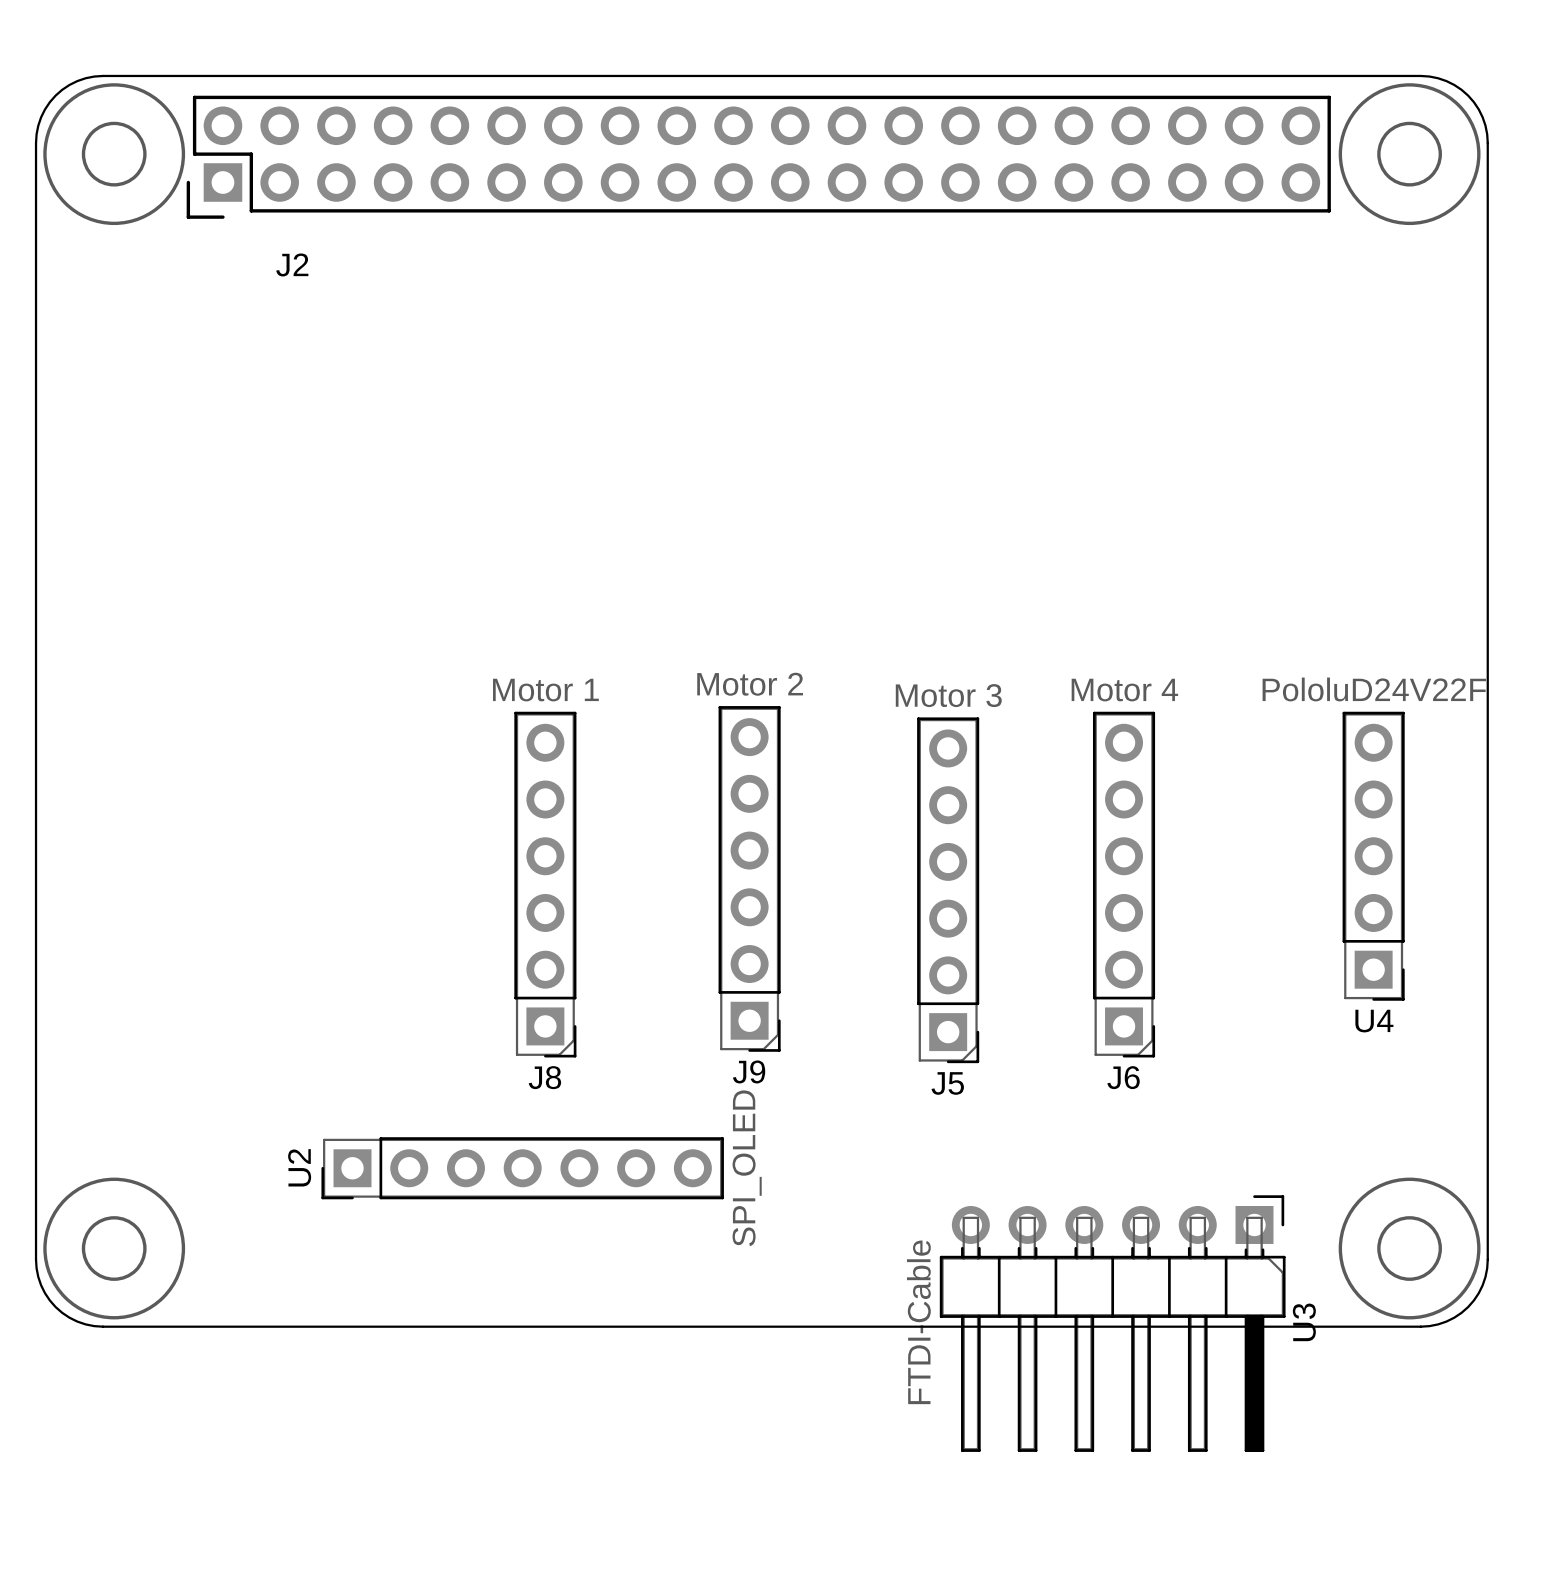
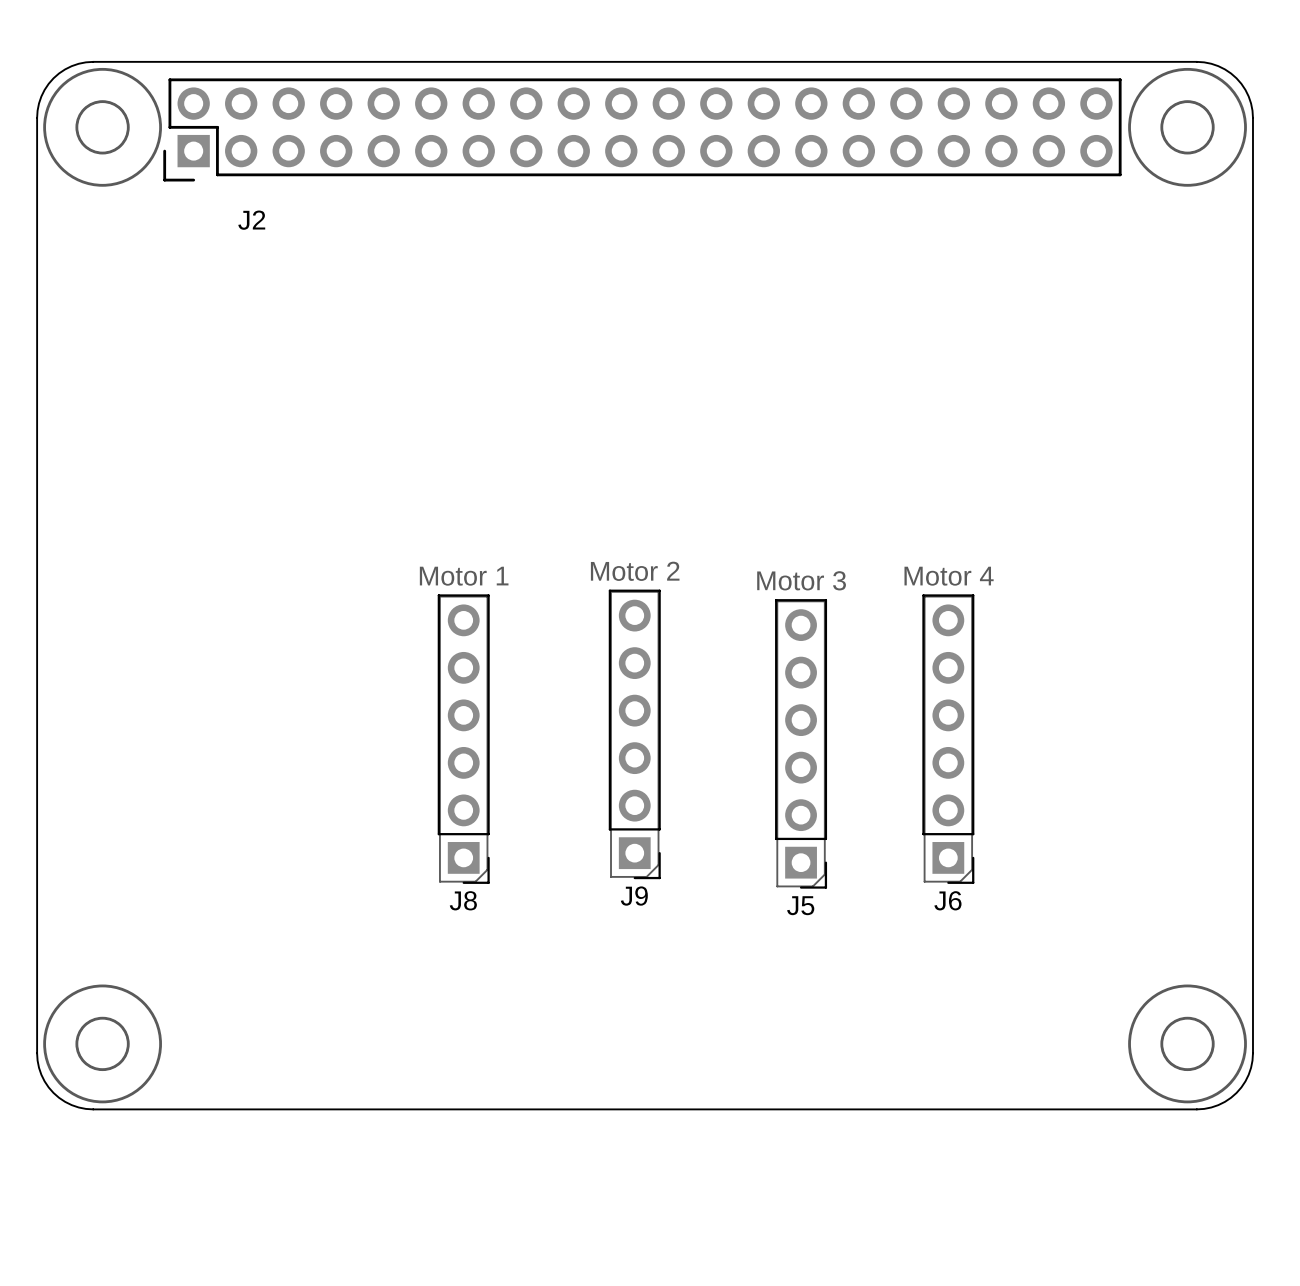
U4: PololuD24V22F (1373, 856) -> none
U2: SPI_OLED (522, 1168) -> none
U3: FTDI-Cable (1112, 1323) -> none

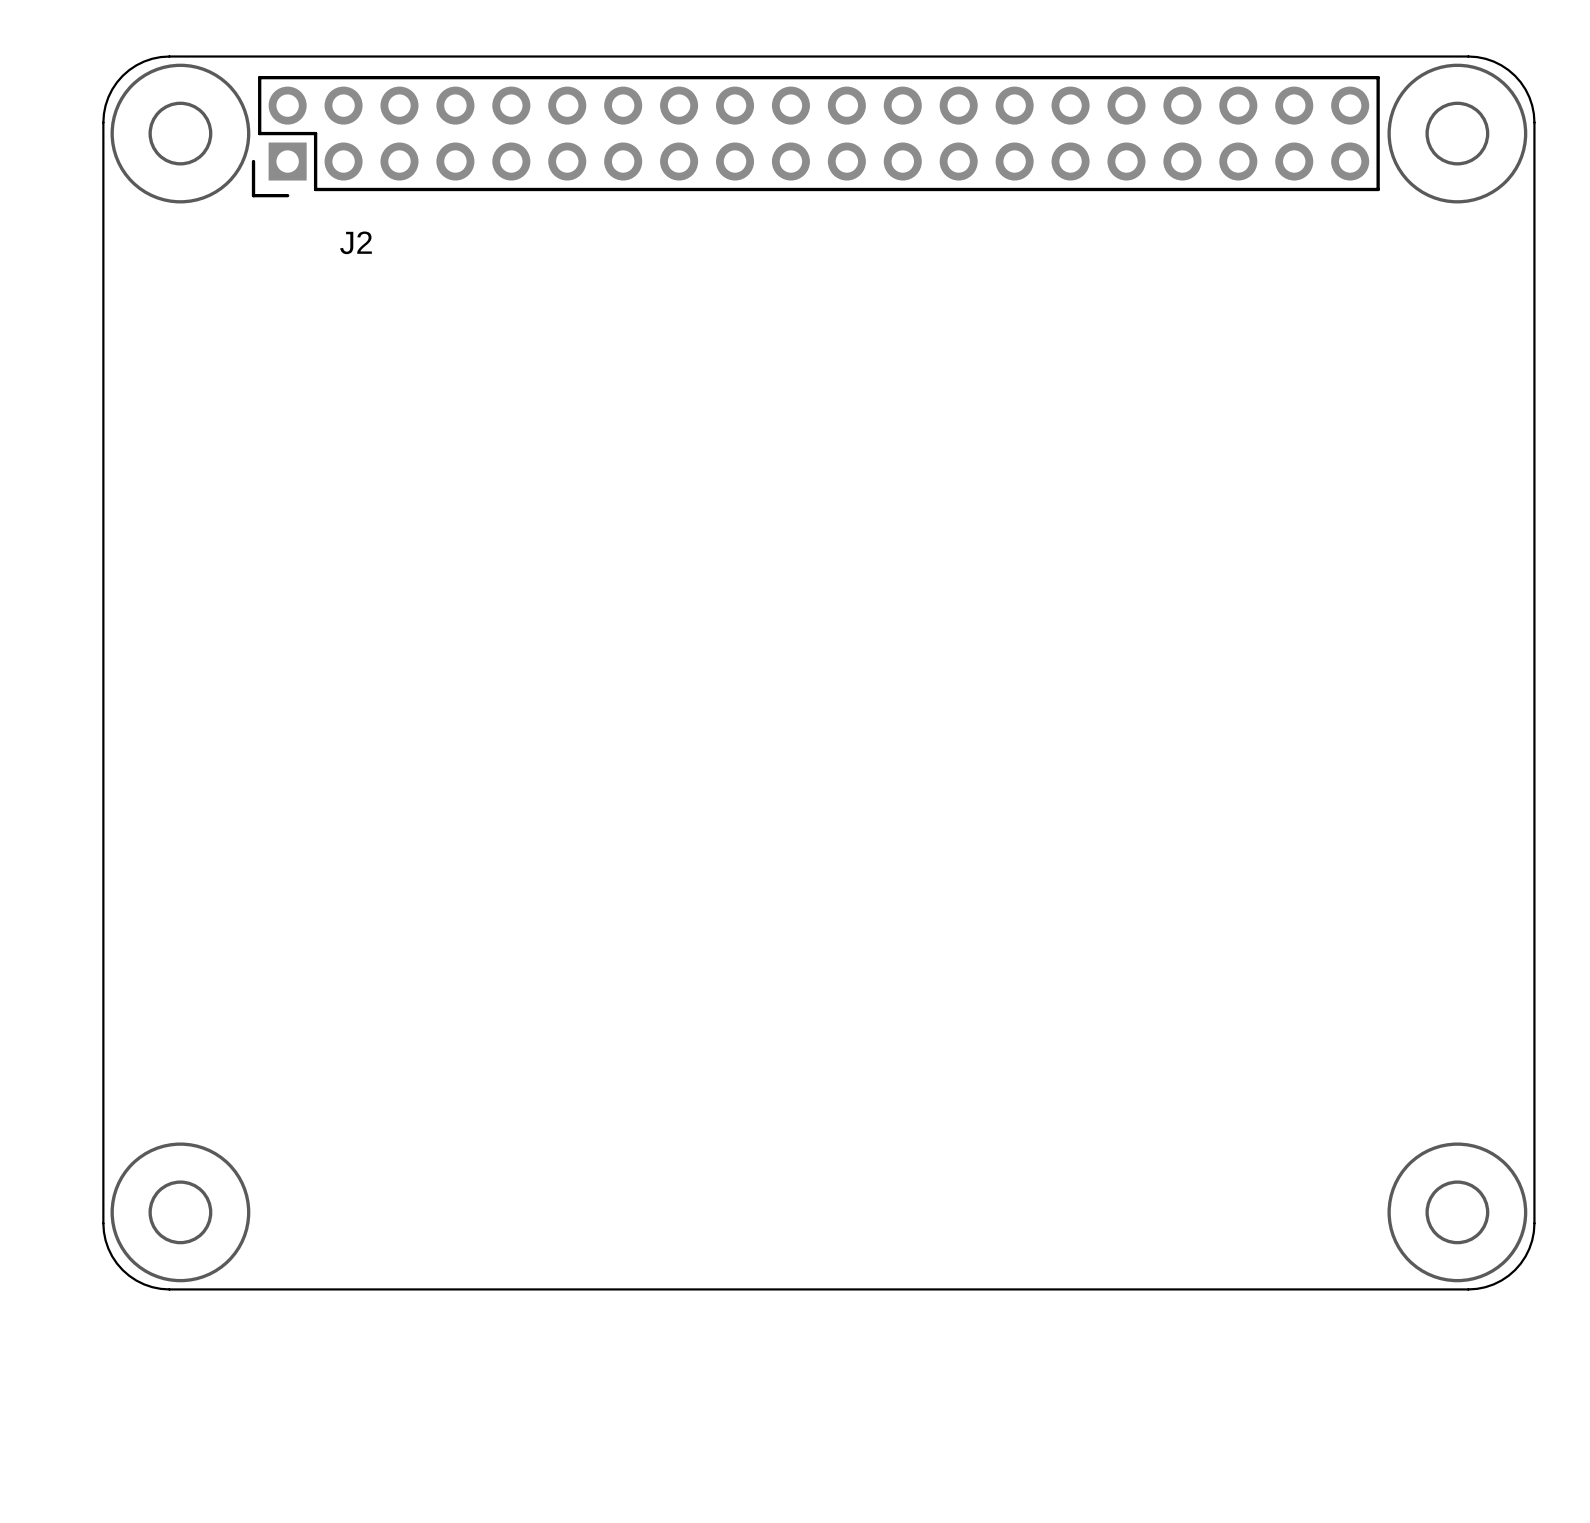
J9: Motor 2 (634, 734) -> none
J8: Motor 1 (463, 739) -> none
J6: Motor 4 (948, 739) -> none
J5: Motor 3 (801, 743) -> none

